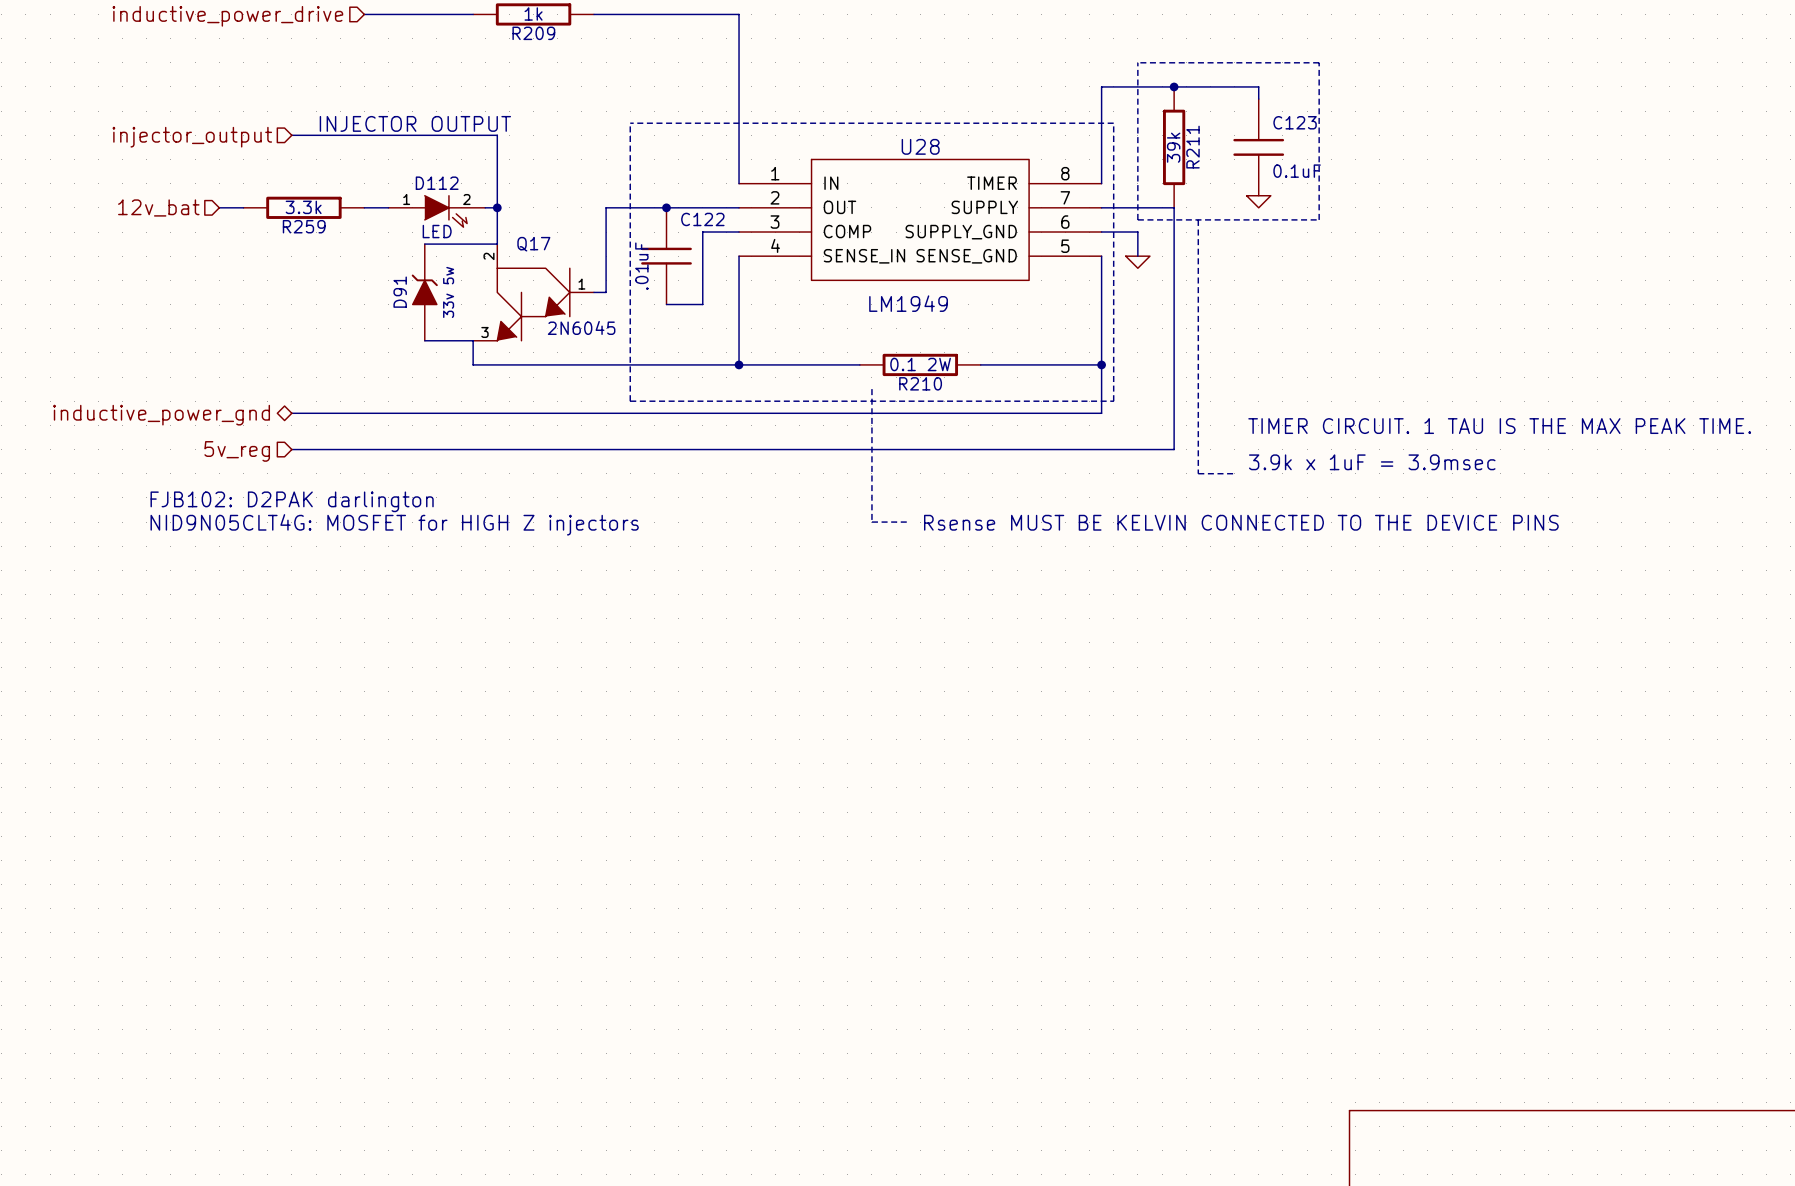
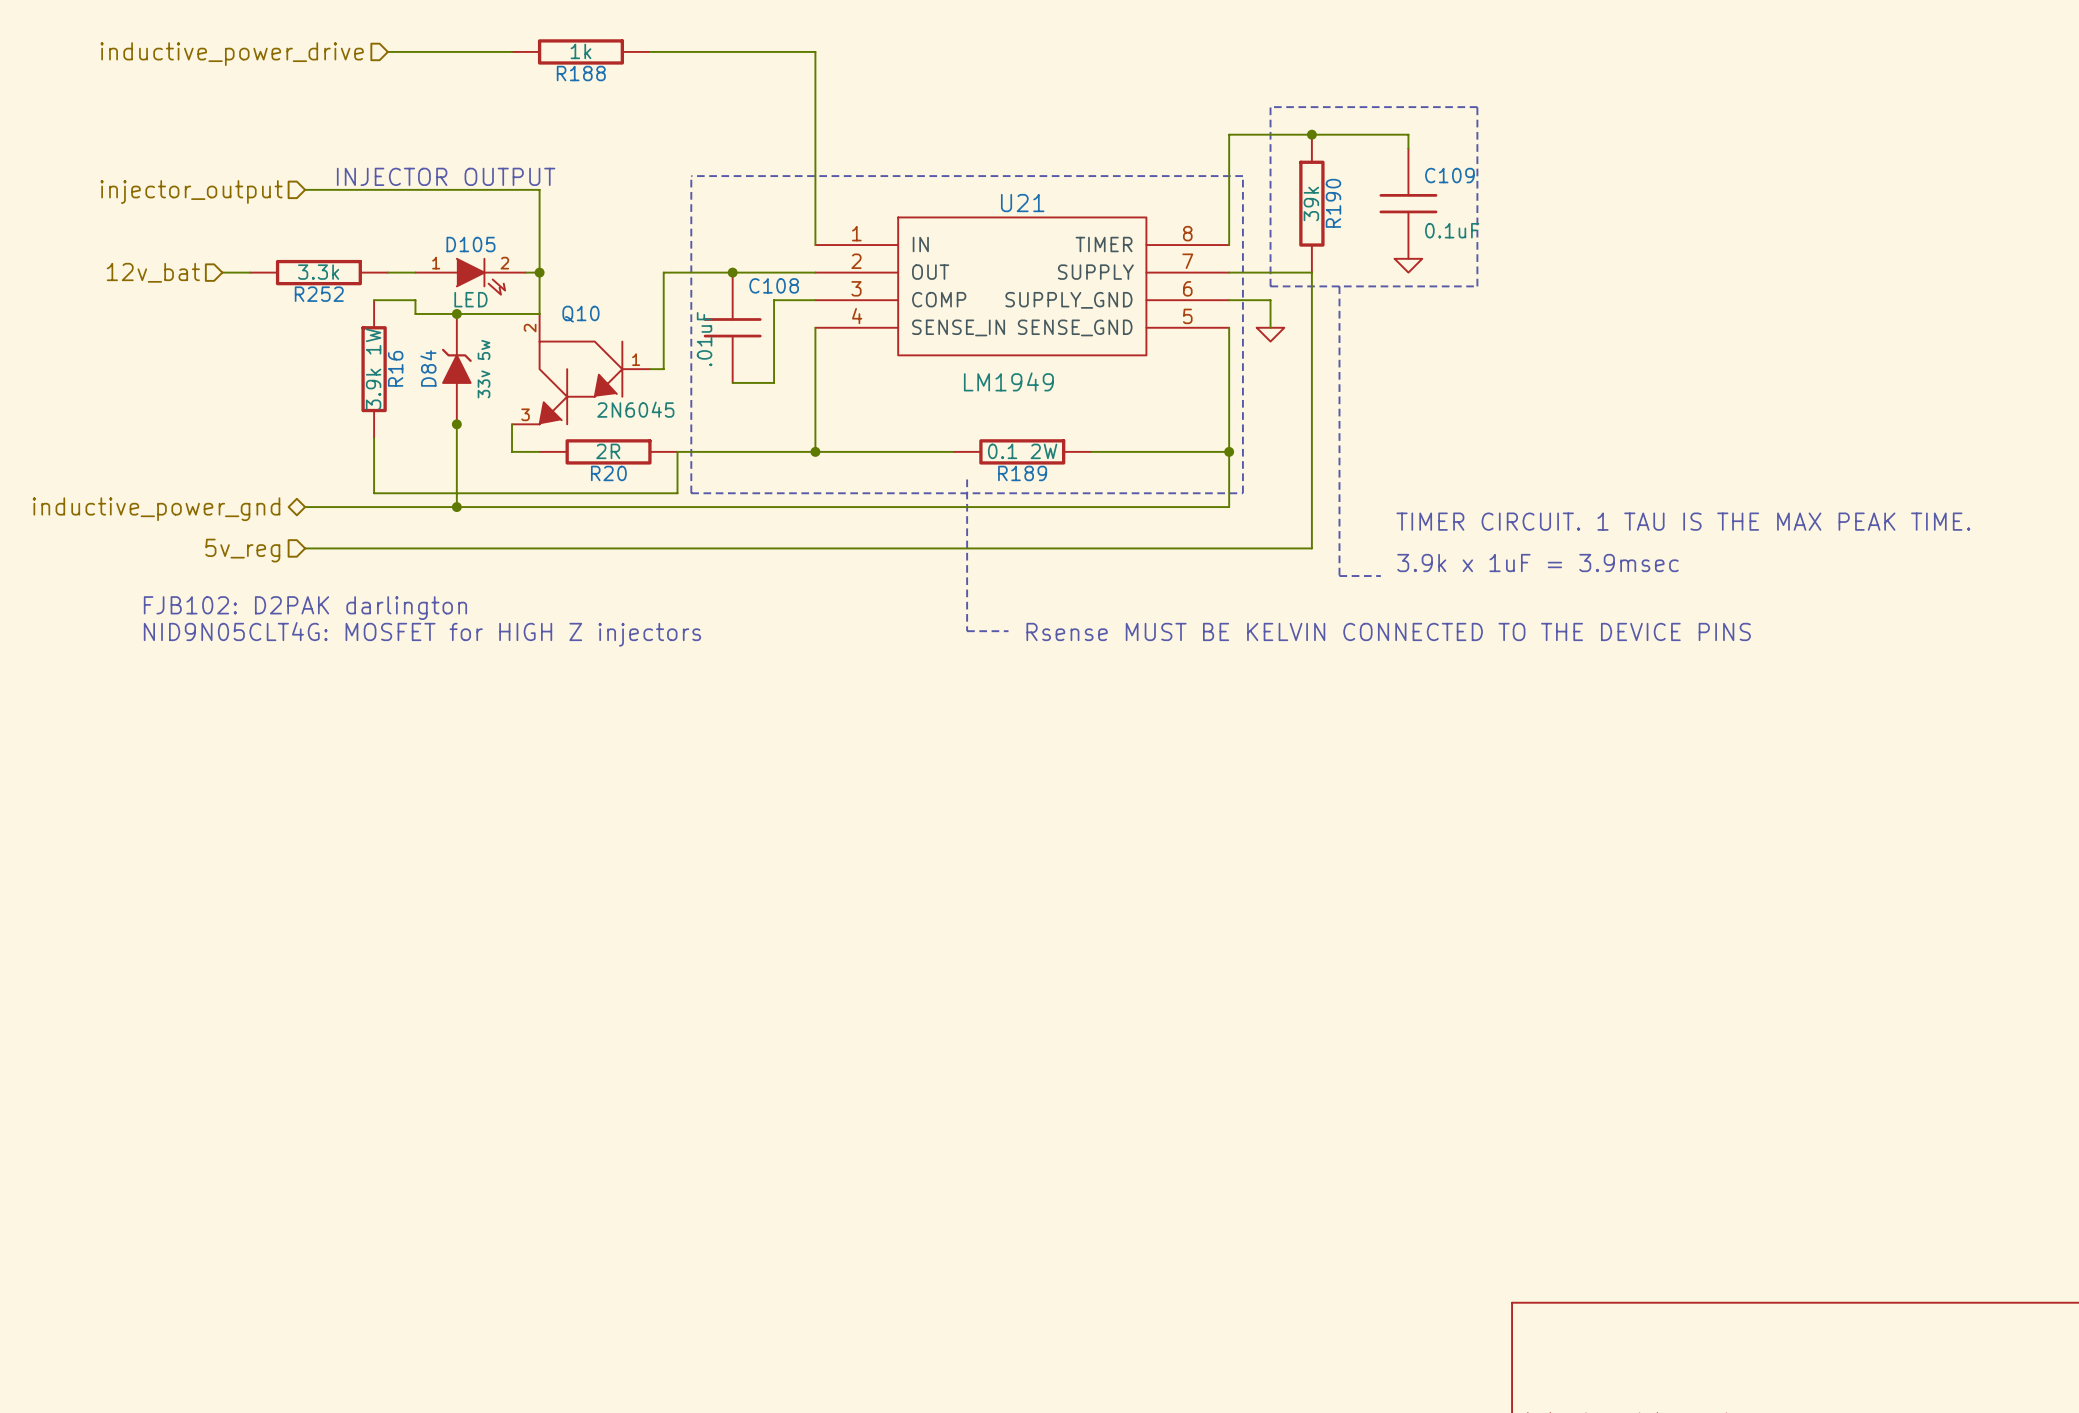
R209 name: R209 (533, 33) -> R188 (581, 73)
C123 name: C123 (1295, 122) -> C109 (1449, 175)
U28 name: U28 (920, 146) -> U21 (1022, 203)
R211 name: R211 (1193, 147) -> R190 (1333, 203)
D112 name: D112 (437, 183) -> D105 (470, 244)
C122 name: C122 (702, 219) -> C108 (774, 285)
R259 name: R259 (304, 226) -> R252 (319, 294)
wire: none -> (374, 300) (415, 300) (415, 313) (456, 313)
junction: none -> (456, 313)
Q17 name: Q17 (533, 244) -> Q10 (580, 314)
R16: none -> 3.9k 1W (374, 369)
D91 name: D91 (400, 292) -> D84 (428, 368)
wire: (424, 340) (473, 340) -> (456, 424) (456, 507)
junction: none -> (456, 424)
wire: (497, 364) (618, 364) -> (374, 438) (374, 493) (677, 493) (677, 451)
R20: none -> 2R (608, 451)
R210 name: R210 (920, 383) -> R189 (1022, 473)
junction: none -> (456, 507)

